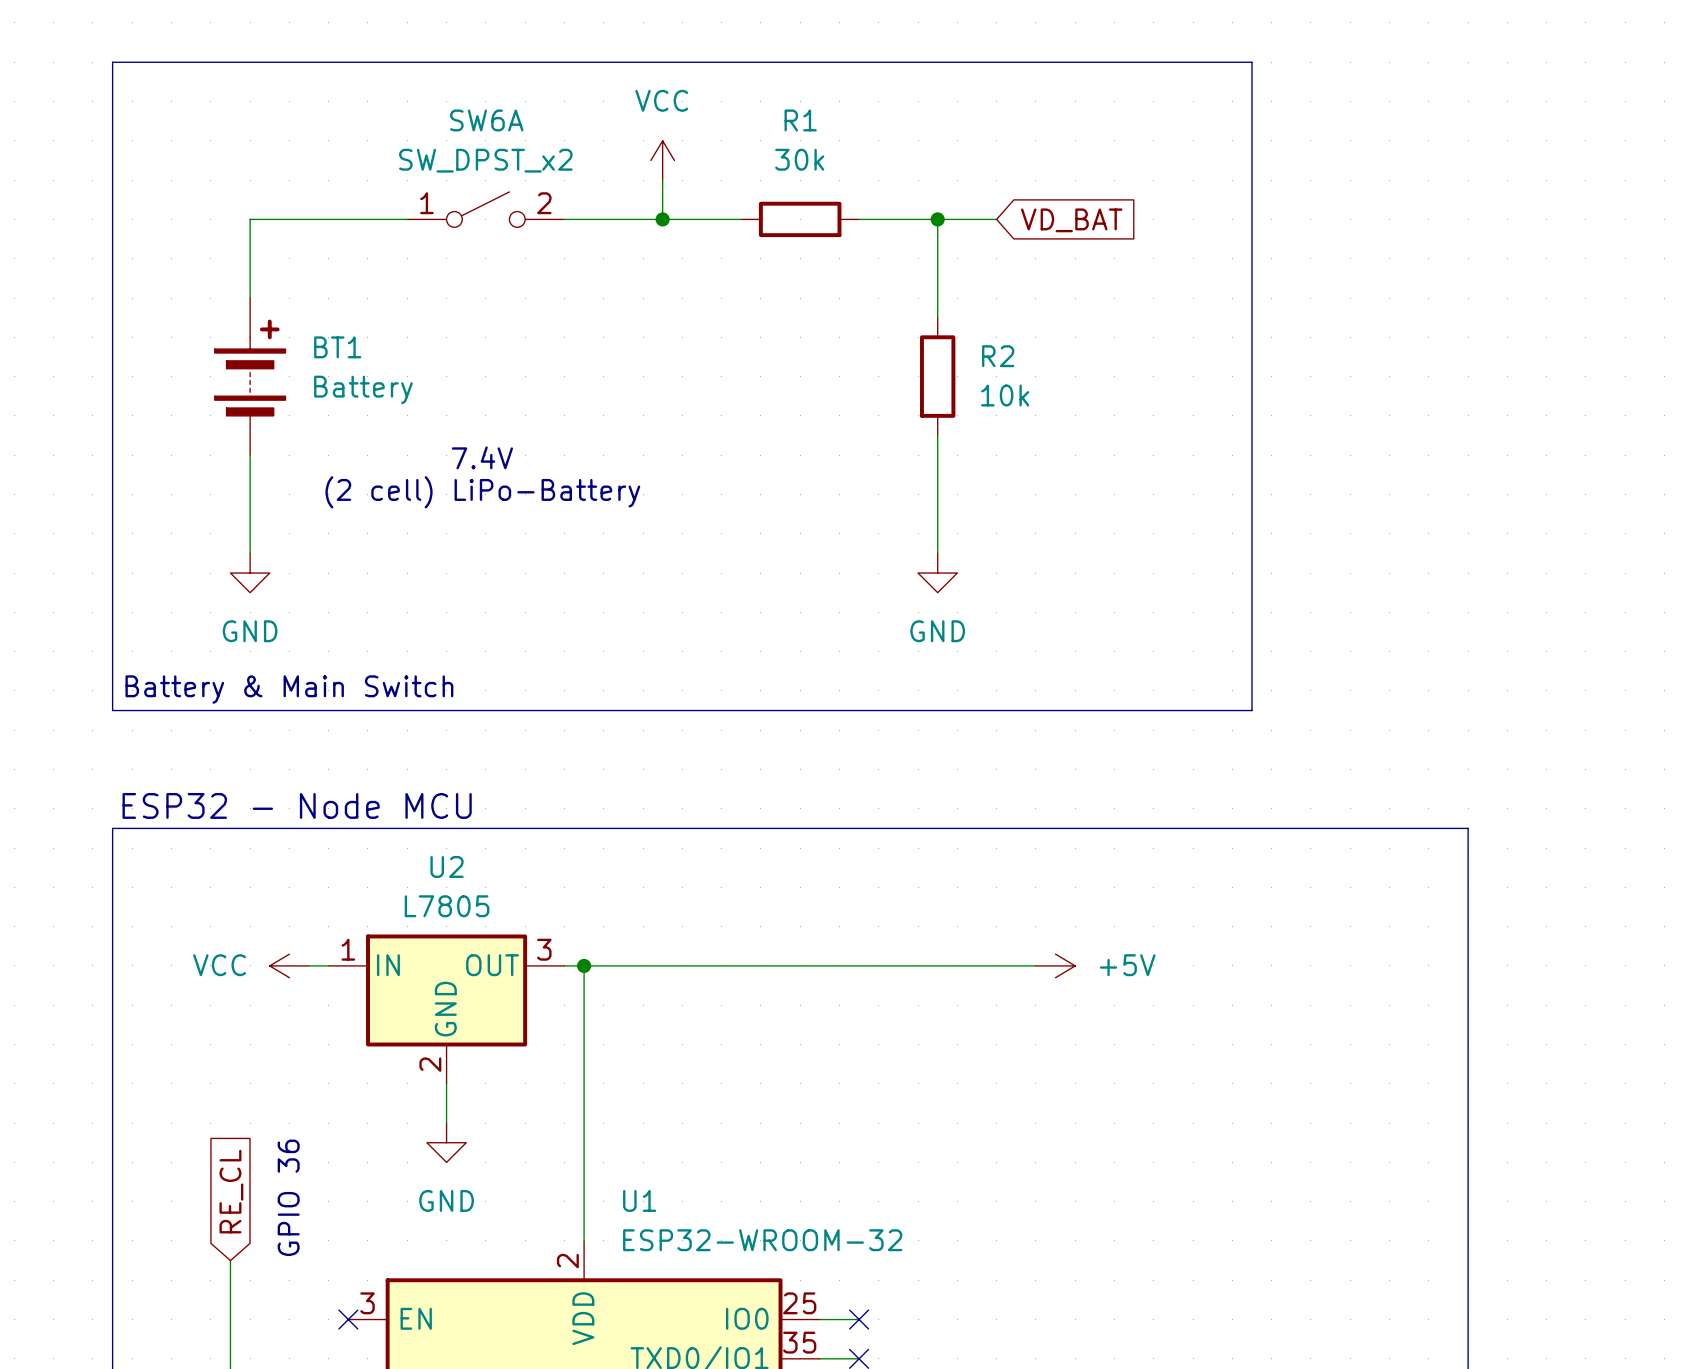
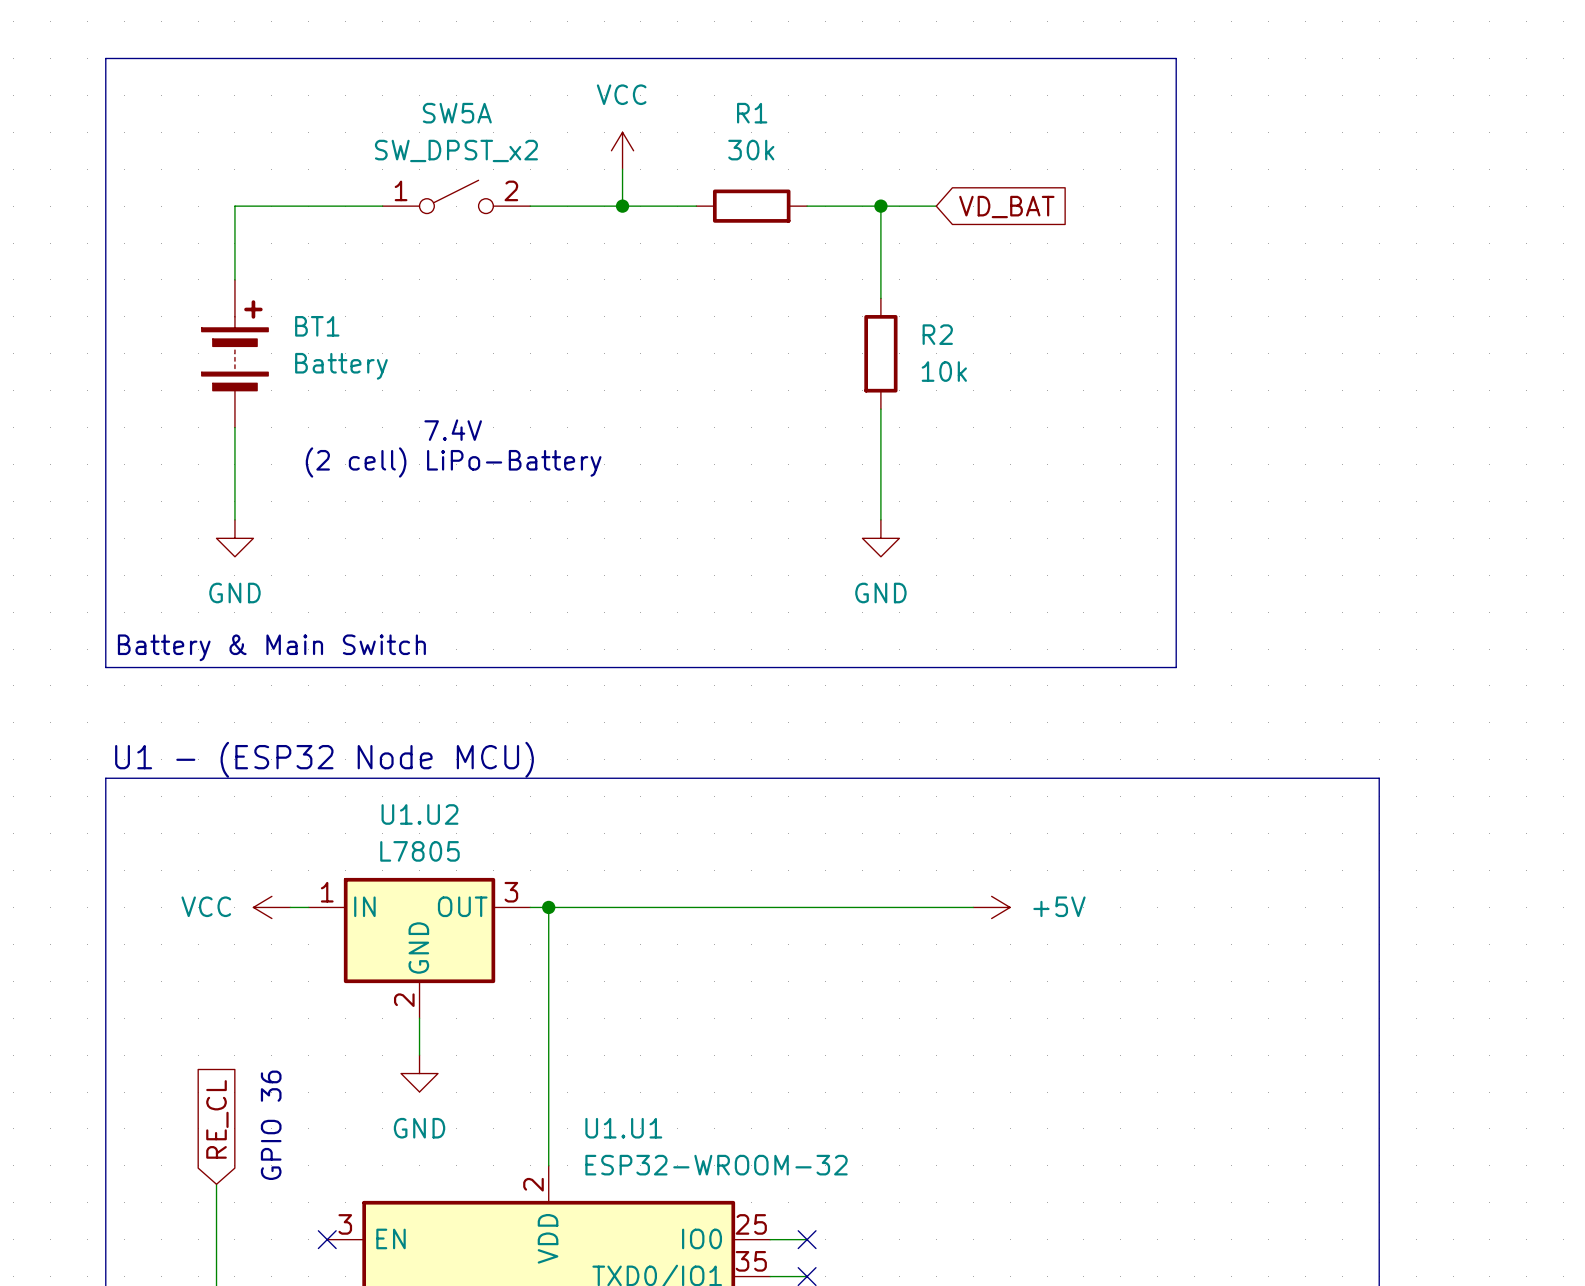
SW6A name: SW6A (486, 120) -> SW5A (457, 113)
text: ESP32 - Node MCU (297, 805) -> U1 - (ESP32 Node MCU) (324, 759)
U2 name: U2 (447, 866) -> U1.U2 (419, 814)
U1 name: U1 (639, 1200) -> U1.U1 (623, 1128)

